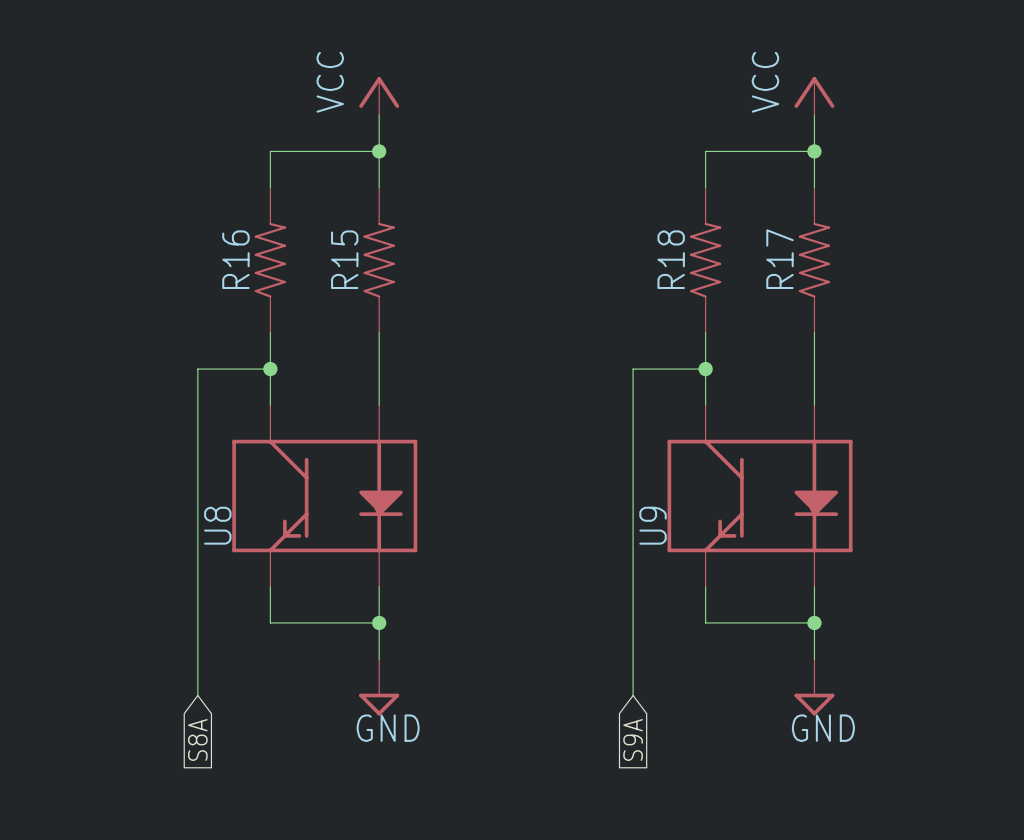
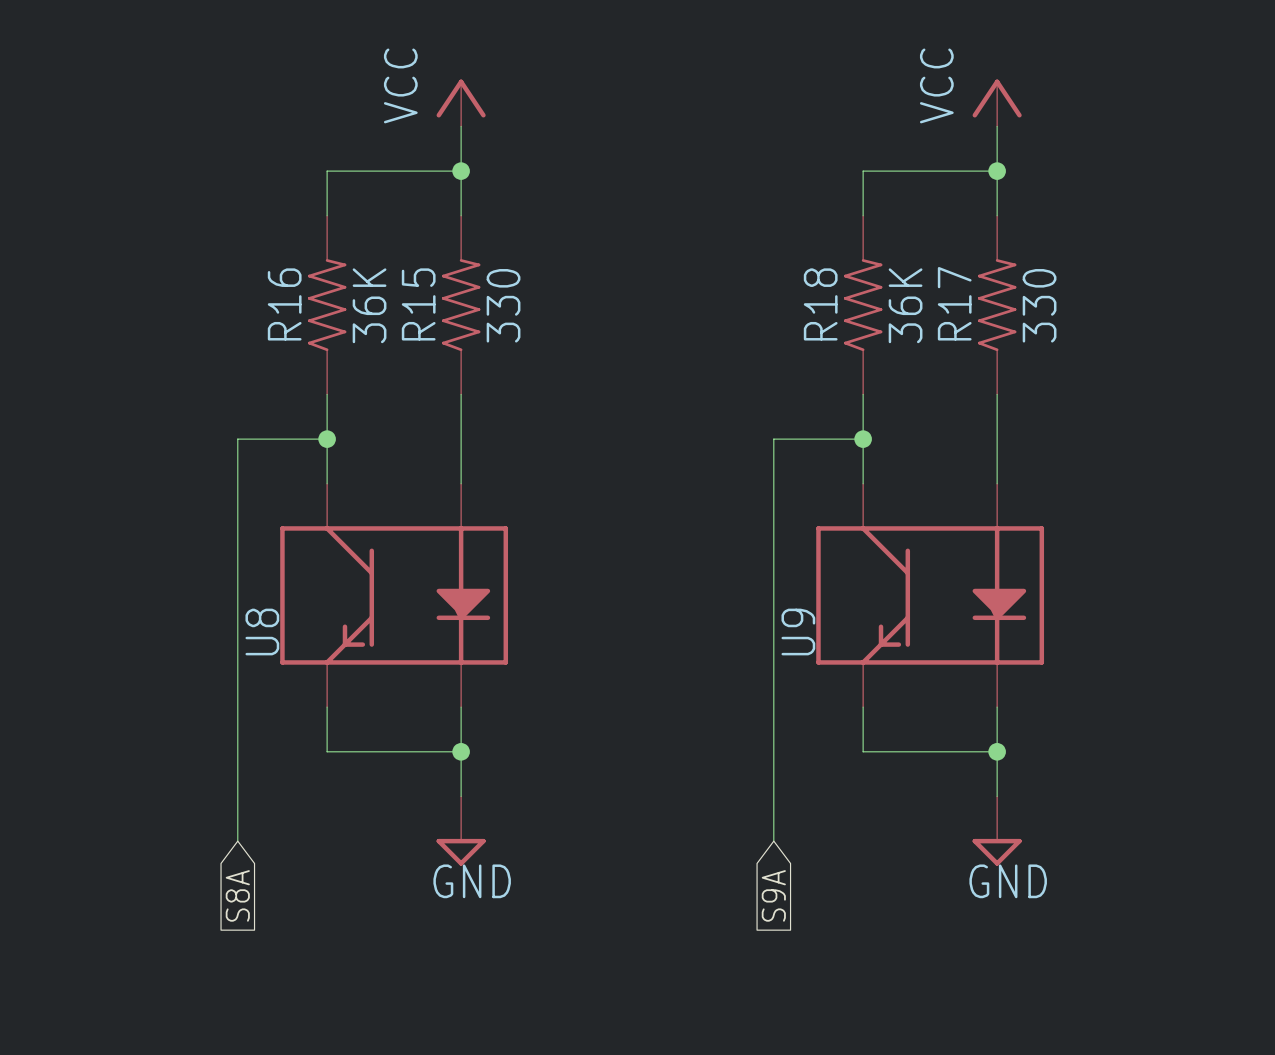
R16 value: none -> 36K (369, 305)
R15 value: none -> 330 (503, 305)
R18 value: none -> 36K (905, 305)
R17 value: none -> 330 (1039, 305)

